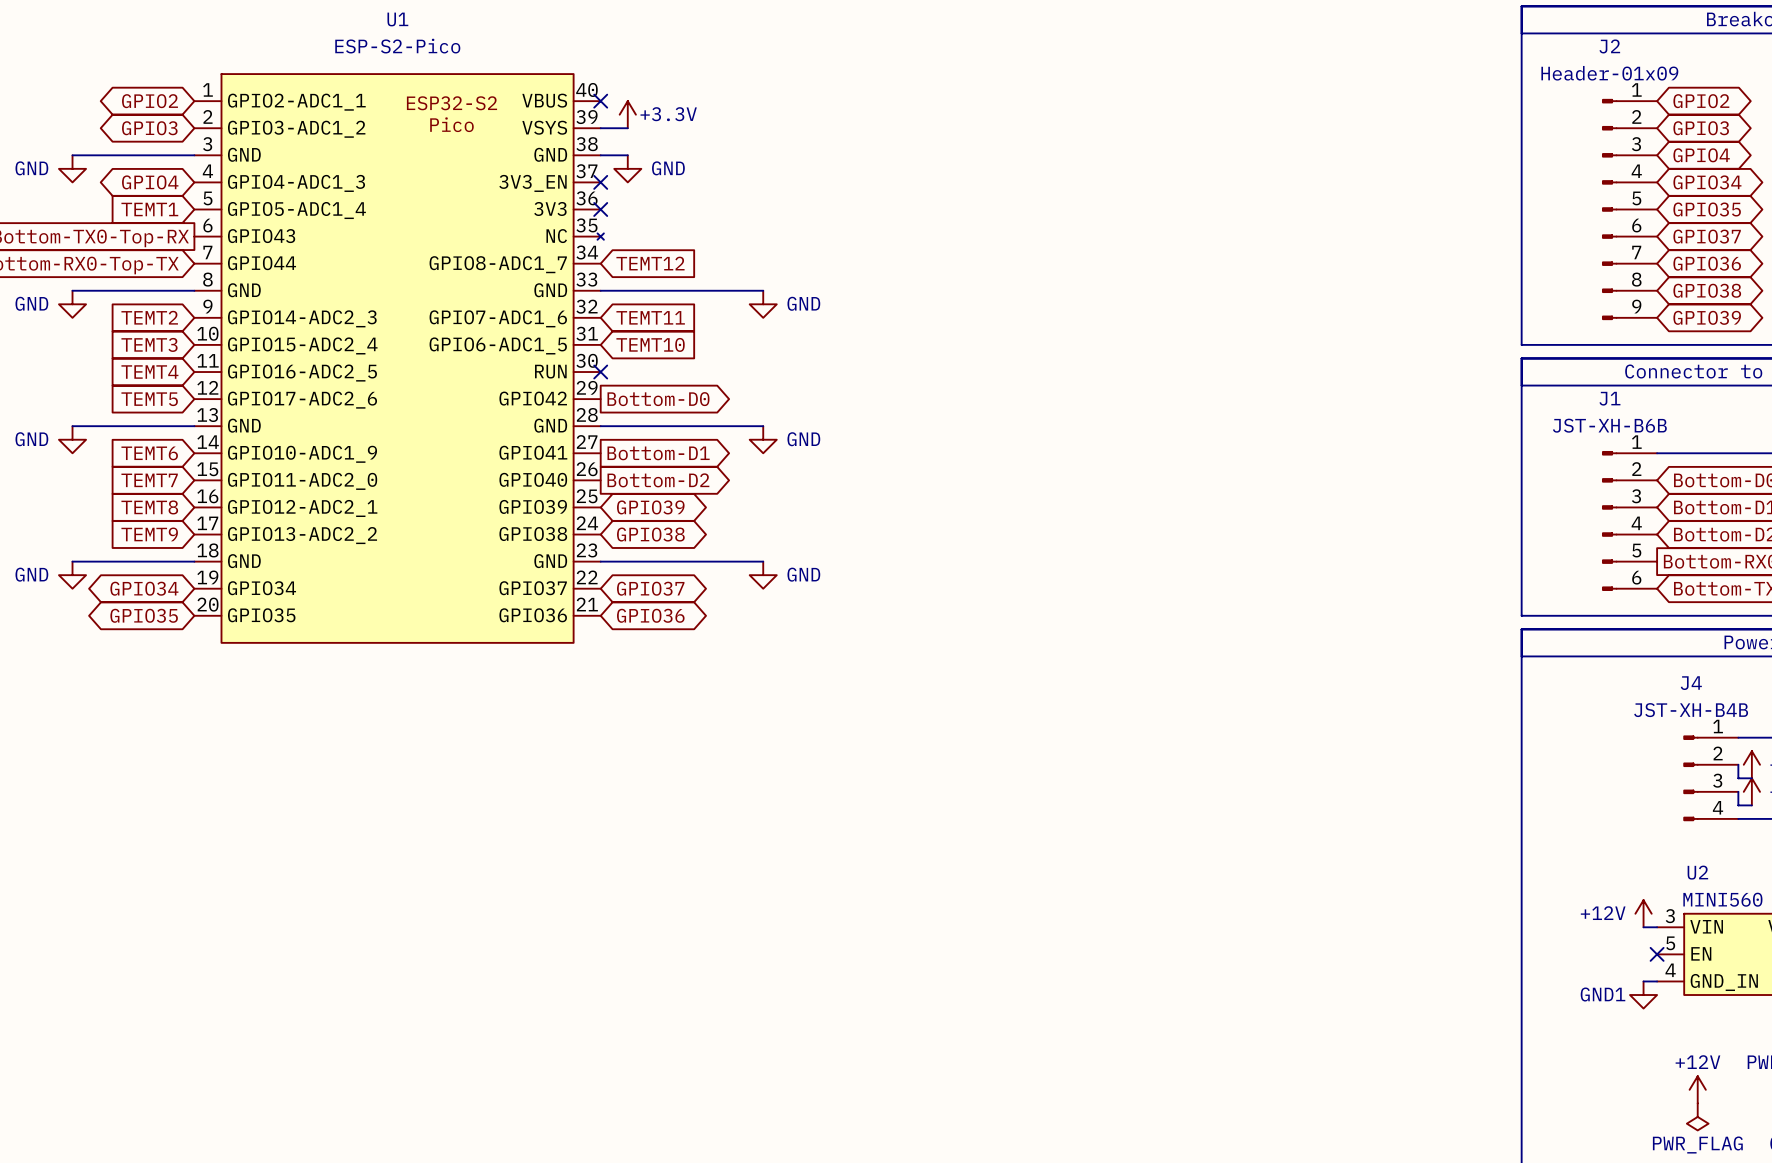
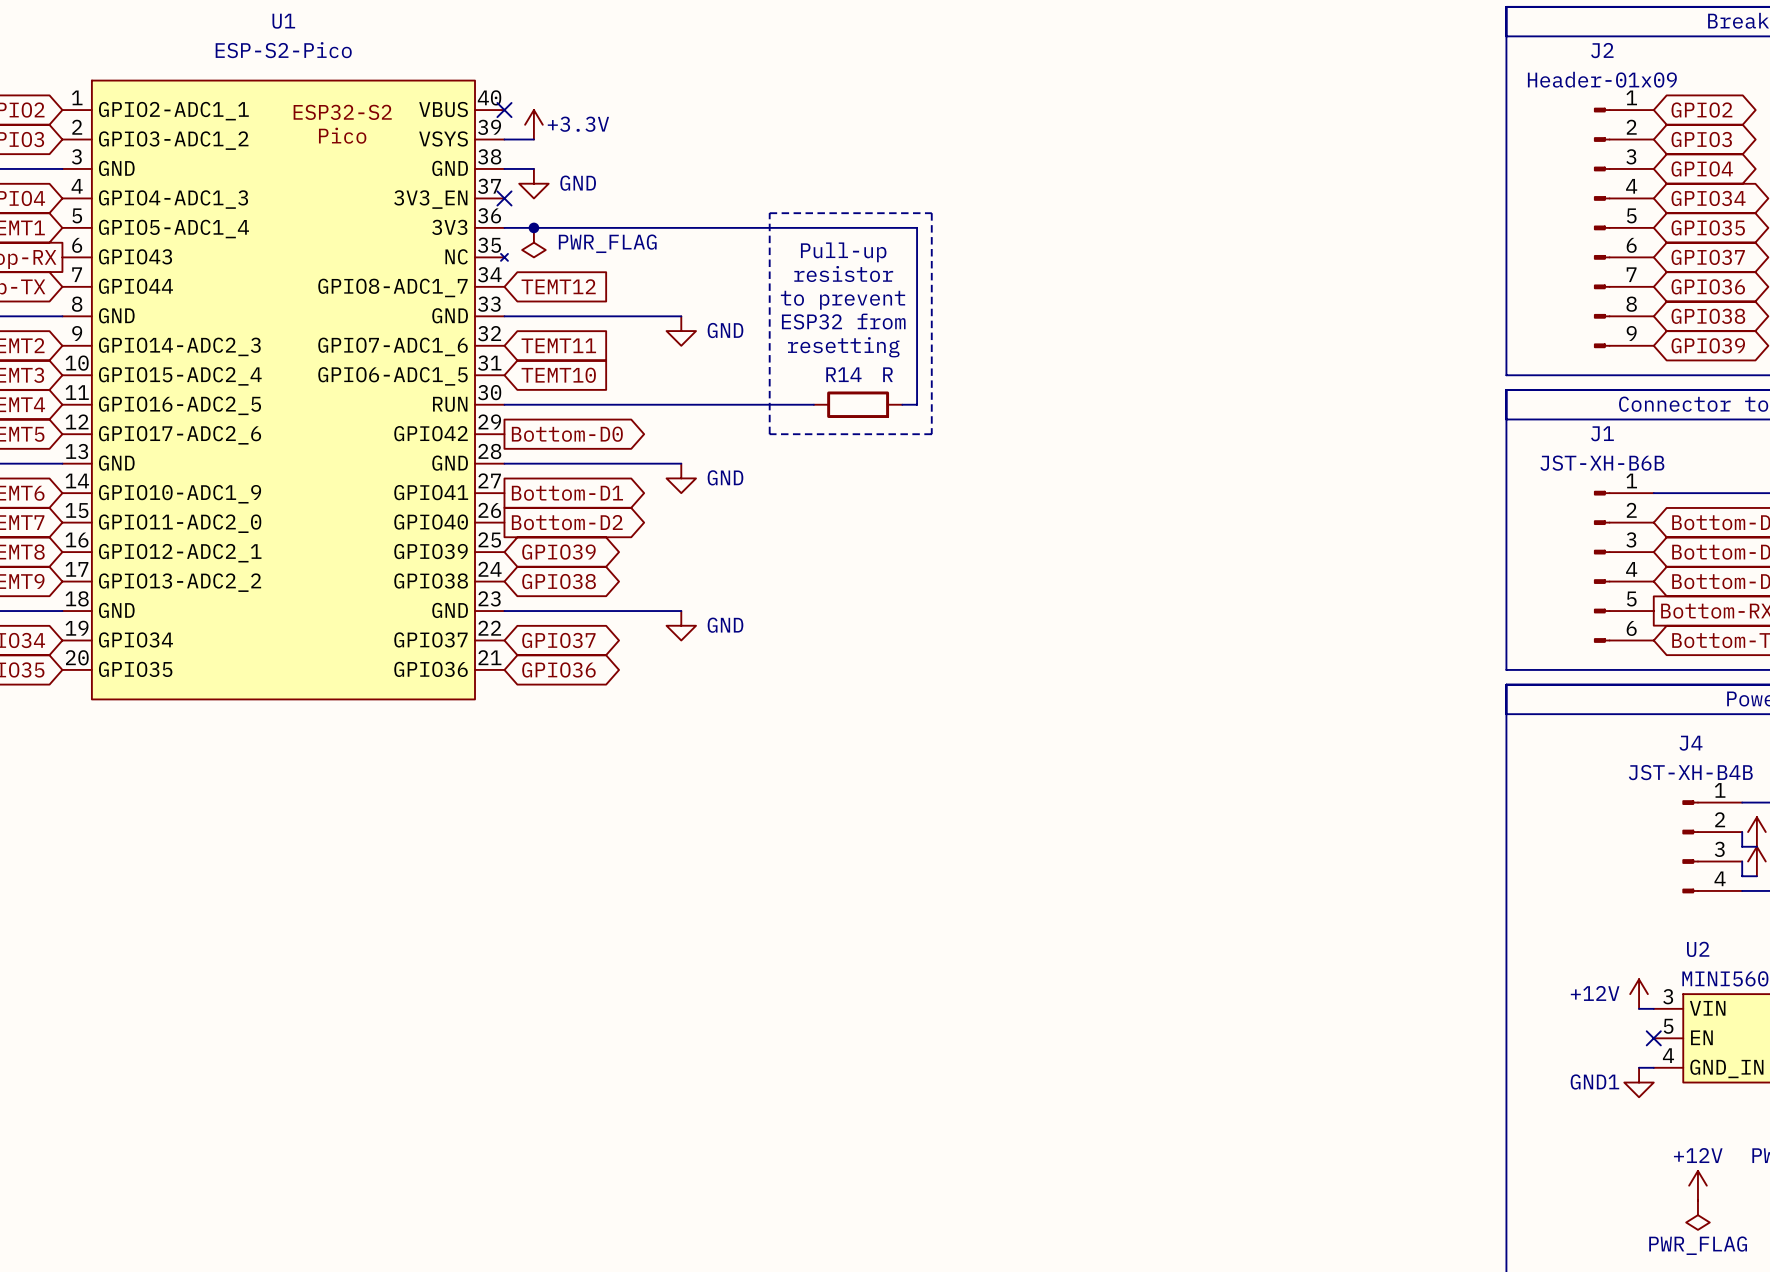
line: none -> (769, 213) (931, 213) (931, 434) (769, 434) (769, 213)
wire: none -> (504, 227) (917, 227) (917, 404) (902, 404)
no-connect mark: (600, 209) -> none
junction: none -> (533, 227)
power symbol: none -> PWR_FLAG (533, 242)
text: none -> Pull-up (843, 252)
text: none -> resistor (843, 274)
text: none -> to prevent (843, 300)
text: none -> ESP32 from (843, 321)
text: none -> resetting (843, 347)
wire: none -> (504, 404) (813, 404)
no-connect mark: (600, 372) -> none
R14: none -> R (858, 404)

